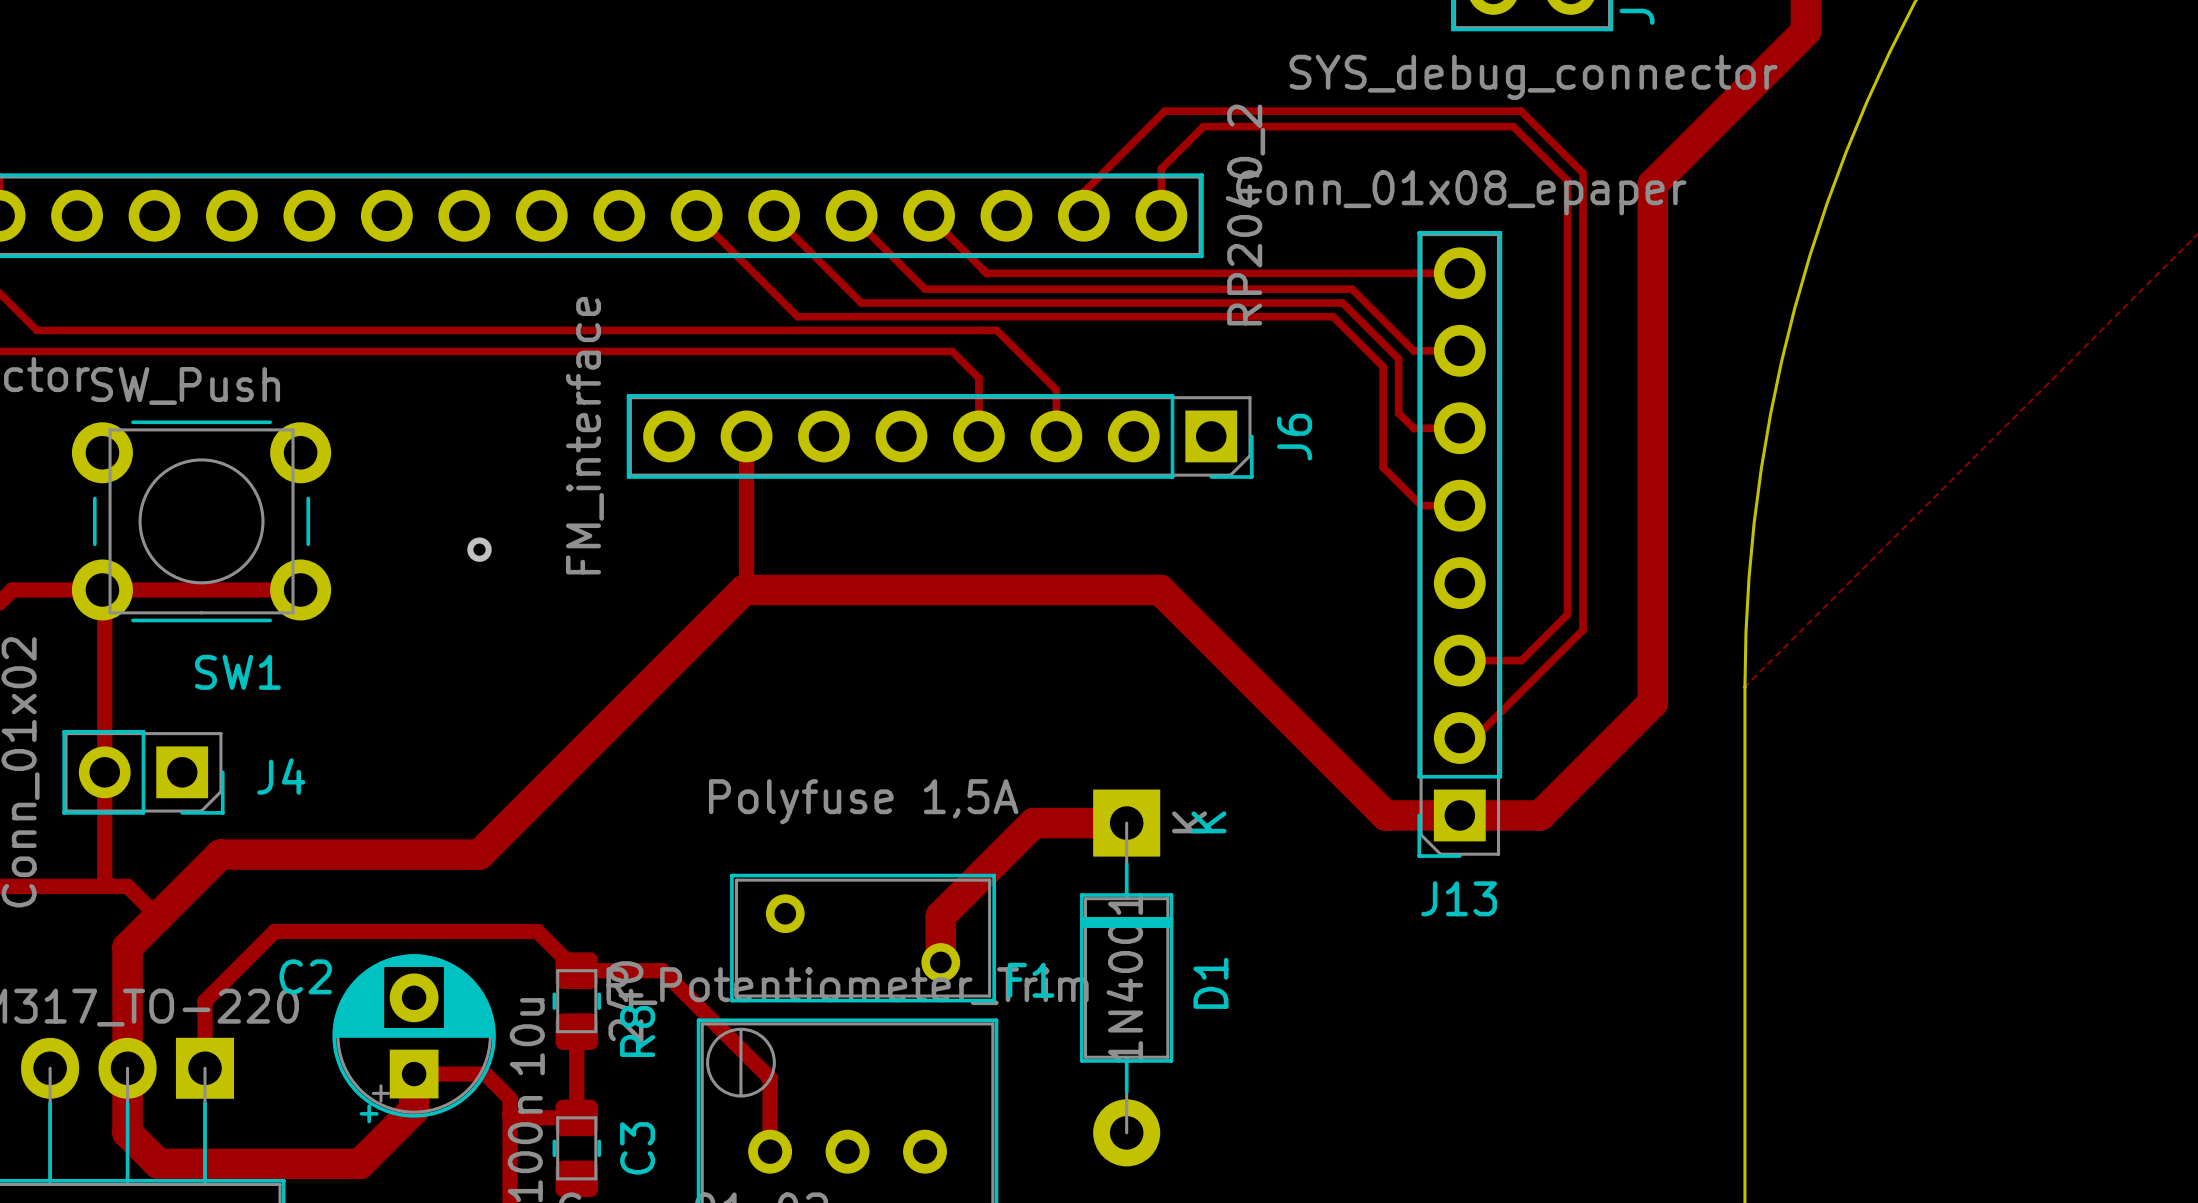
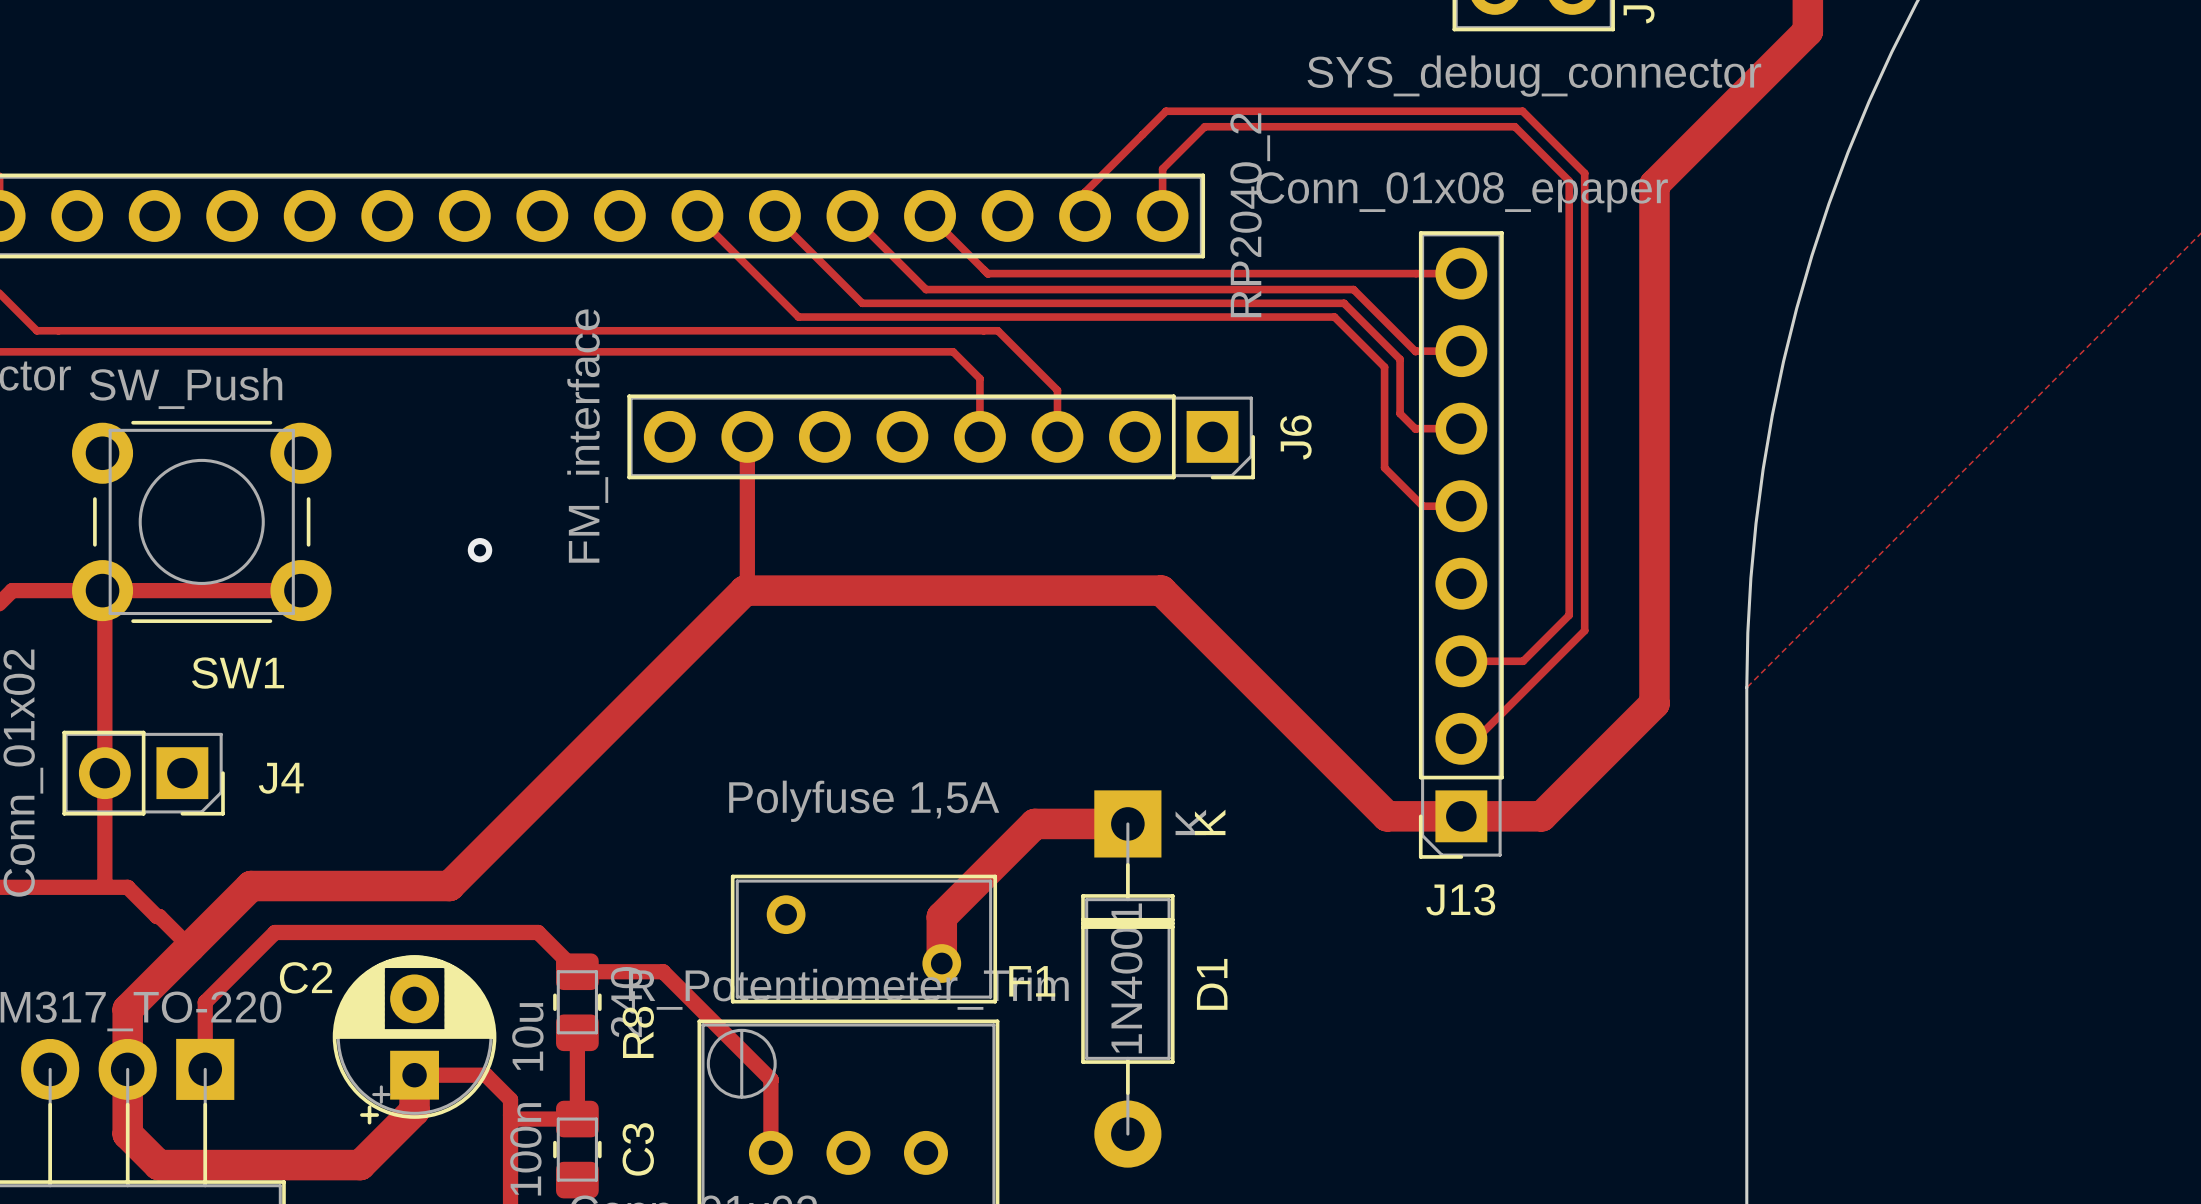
track: (479, 854) (220, 854) (127, 947) (127, 1008) -> (480, 855) (449, 886) (251, 886) (127, 1009)
track: none -> (159, 916) (190, 947)

